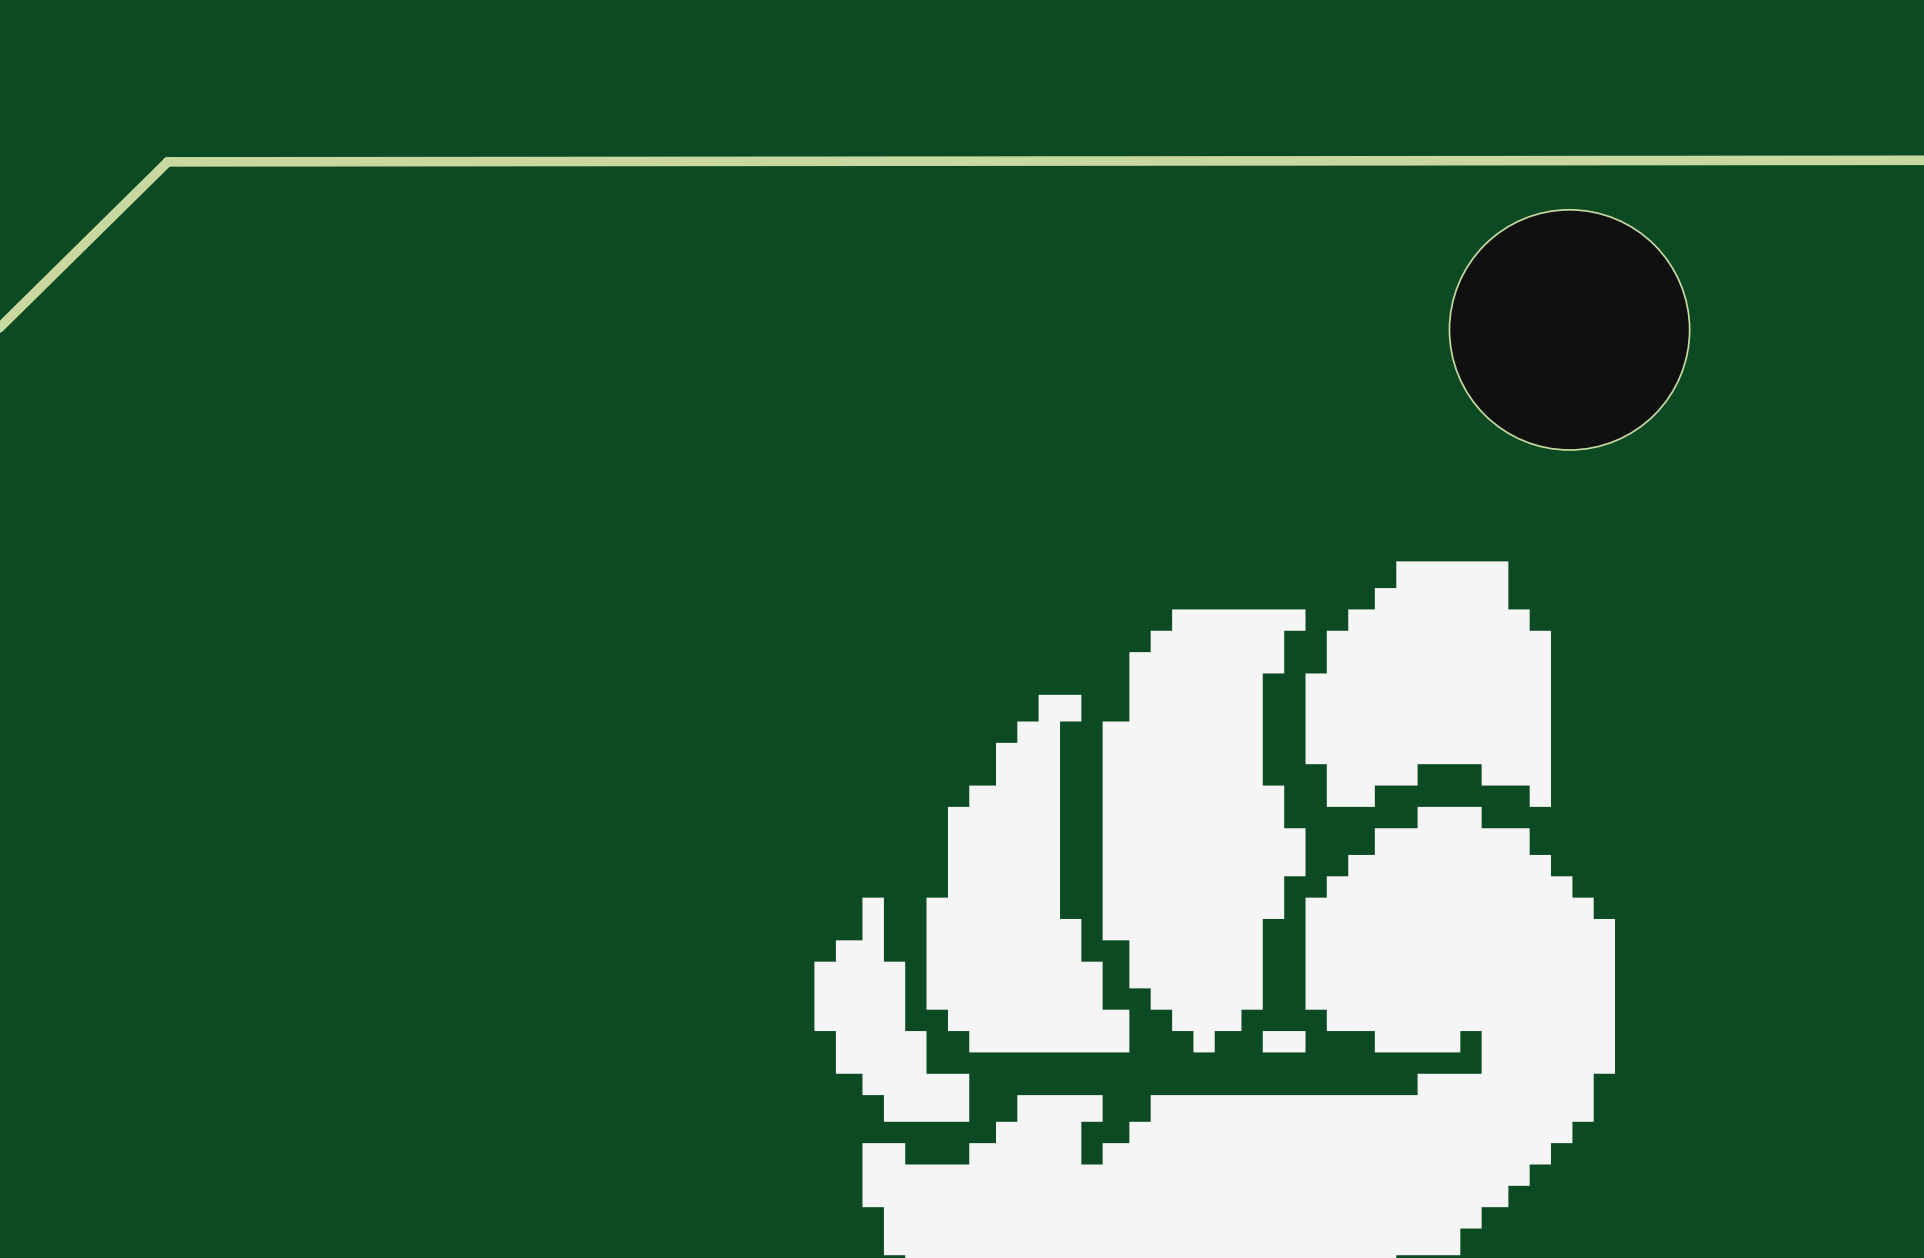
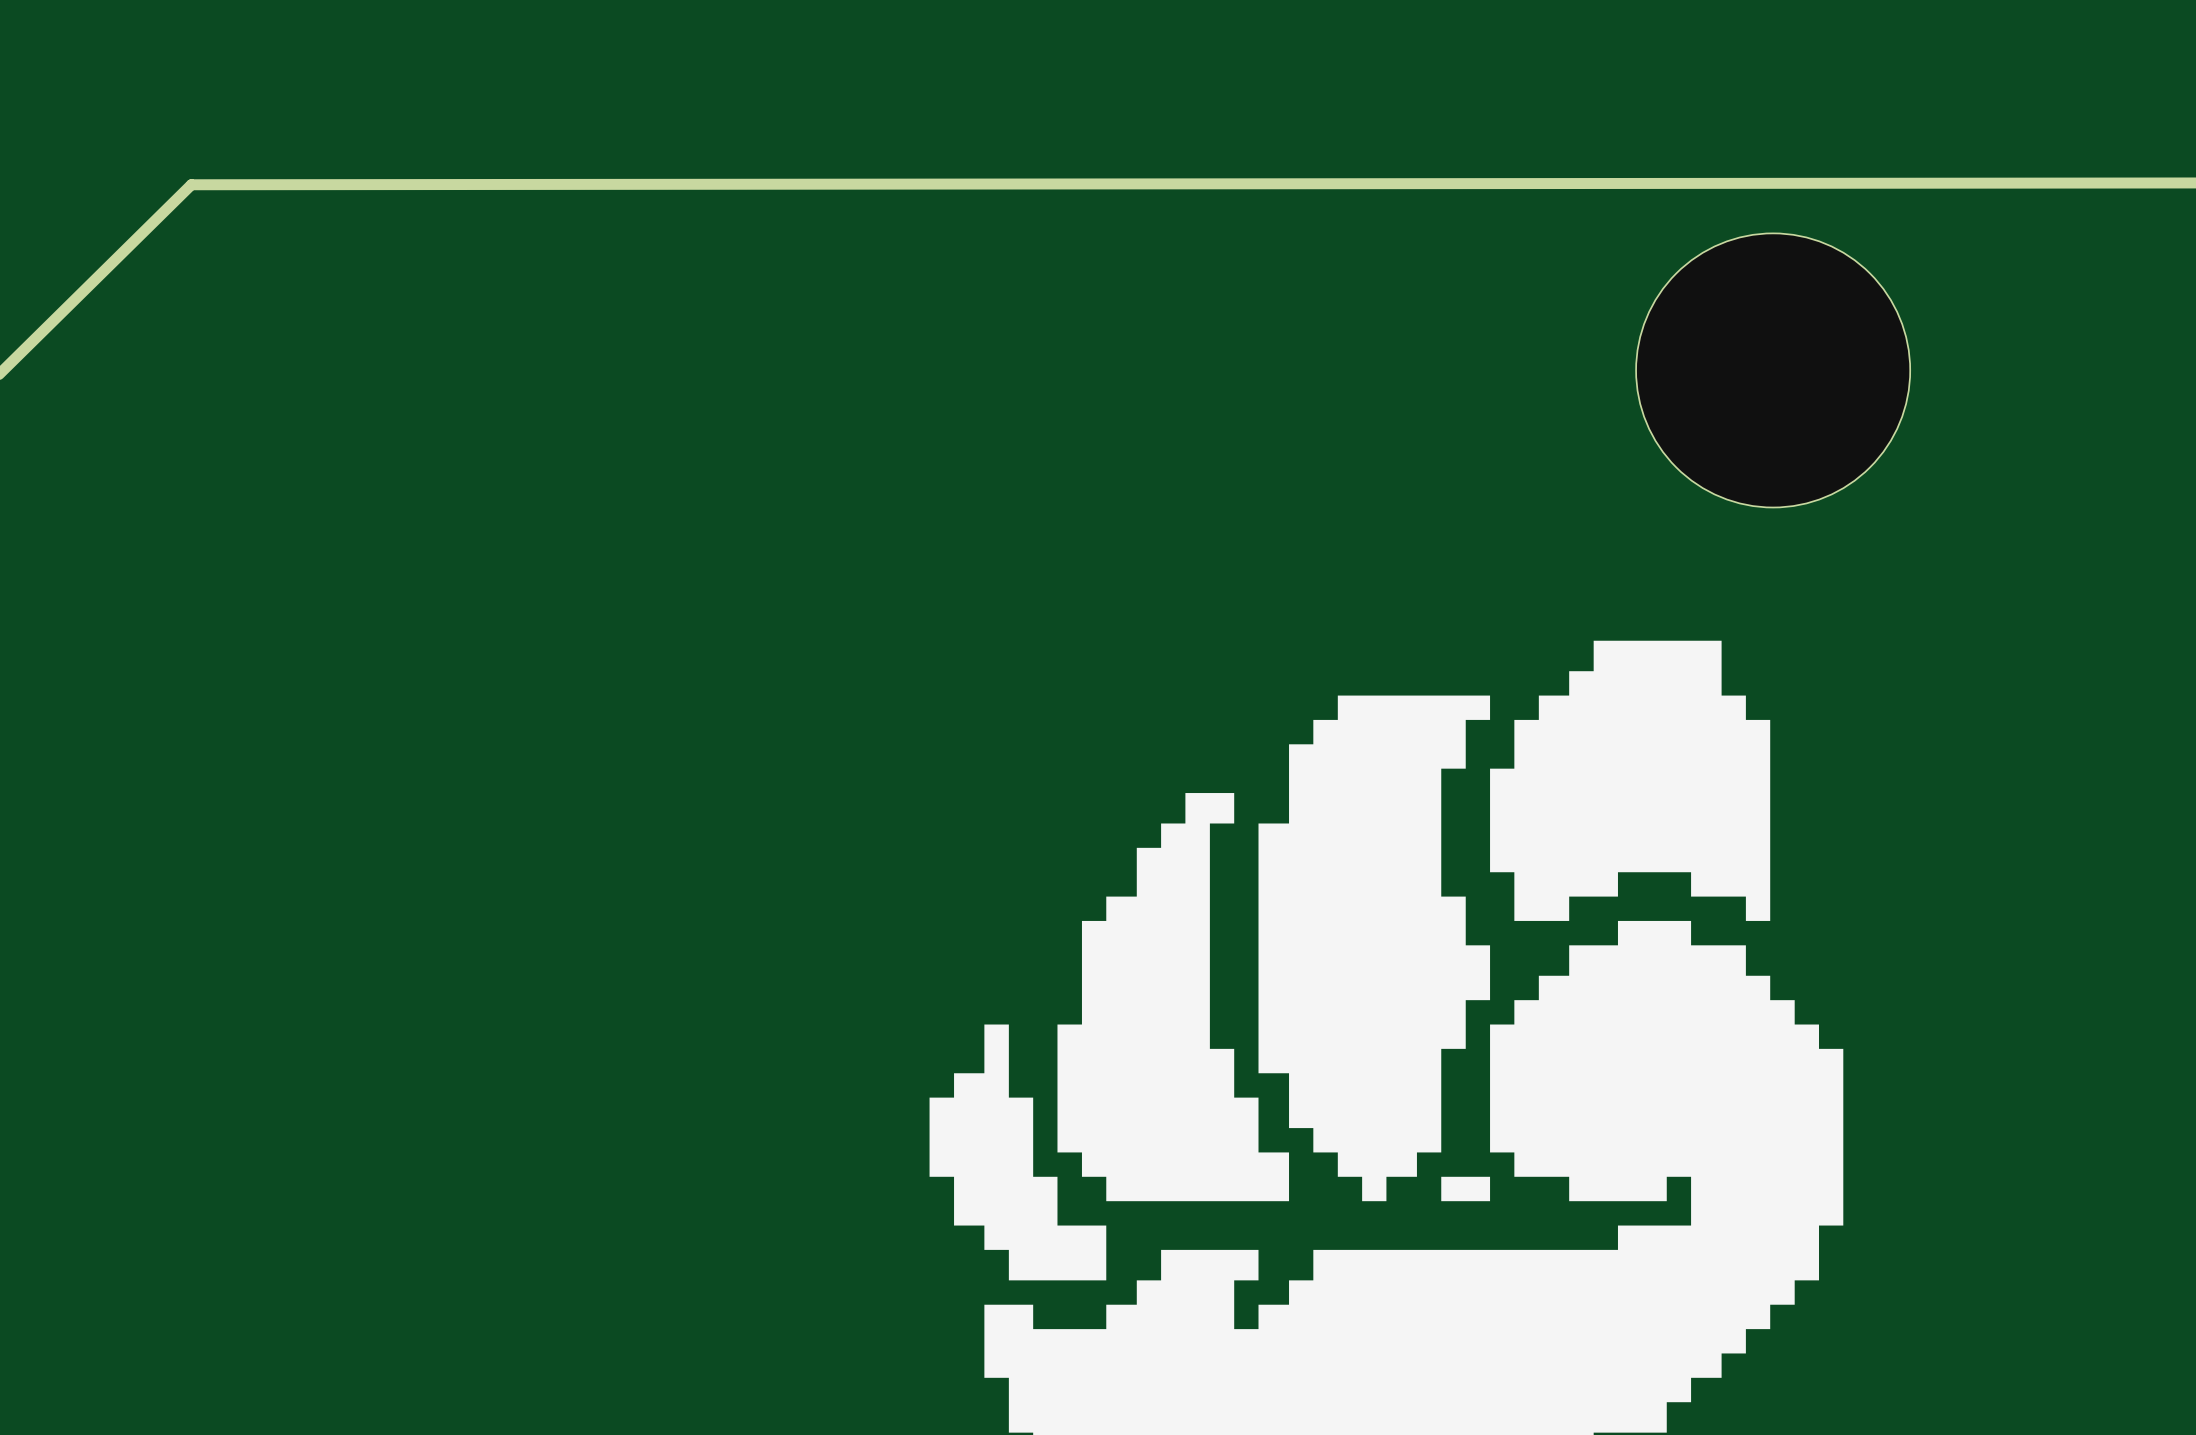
hole position: (1569, 329) -> (1773, 370)

